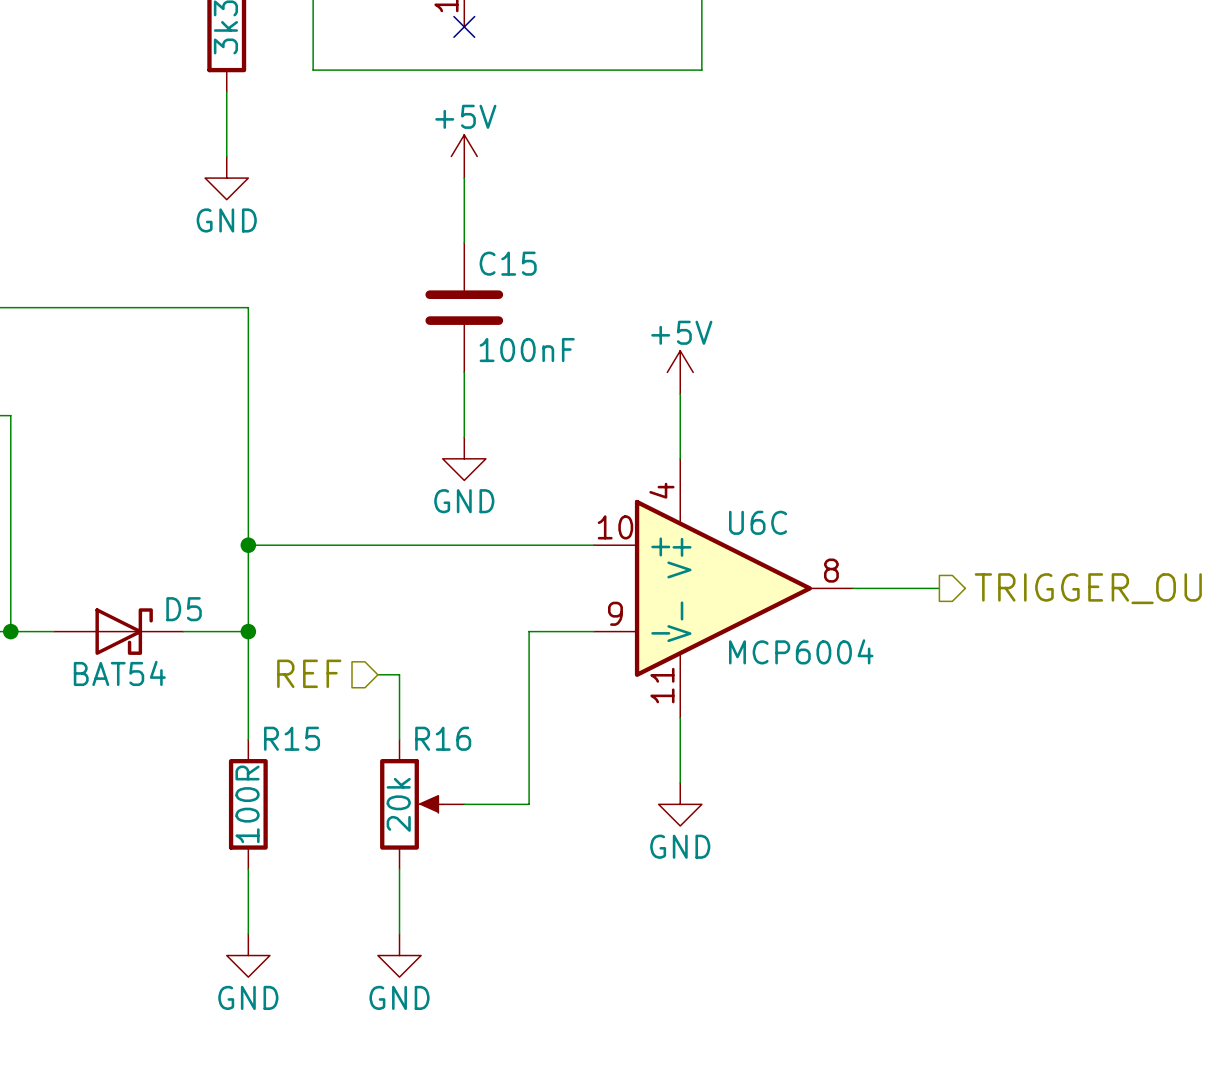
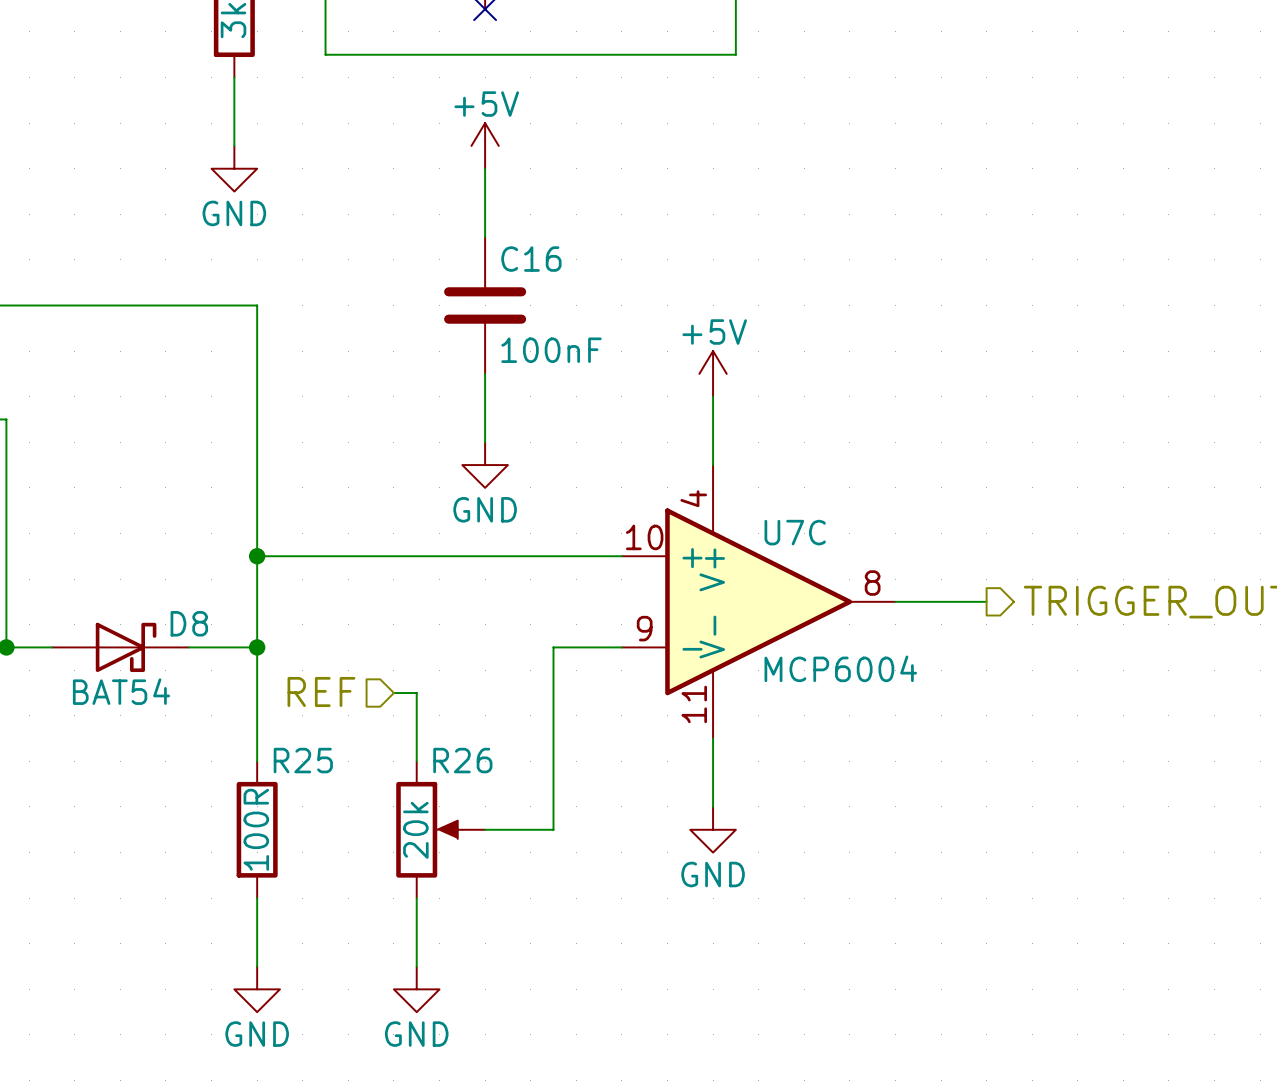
C15 name: C15 (508, 263) -> C16 (531, 259)
U6C name: U6C (758, 522) -> U7C (795, 532)
D5 name: D5 (184, 609) -> D8 (189, 623)
R15 name: R15 (292, 738) -> R25 (303, 760)
R16 name: R16 (443, 738) -> R26 (462, 760)

